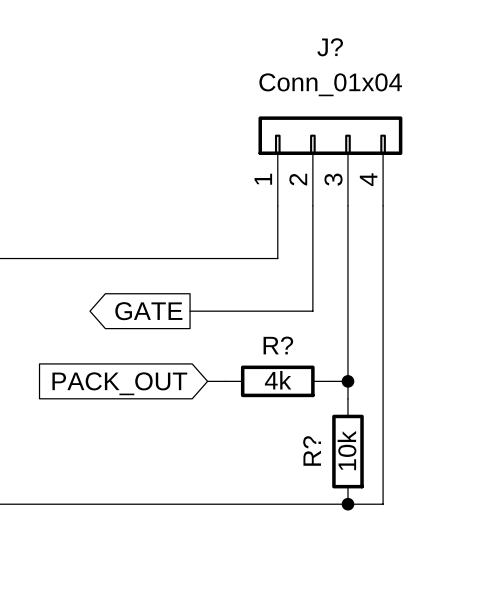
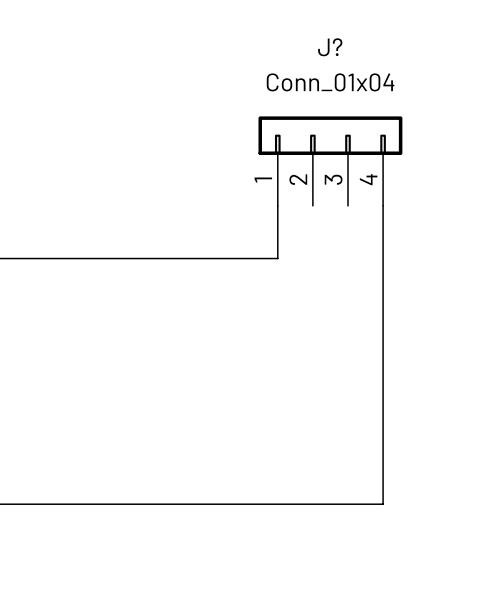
wire: (312, 205) (312, 311) (190, 311) -> none
wire: (347, 205) (347, 398) -> none
global label: GATE (148, 311) -> none
wire: (207, 381) (225, 381) -> none
R?: 4k (277, 381) -> none
wire: (330, 381) (347, 381) -> none
junction: (347, 381) -> none
global label: PACK_OUT (119, 383) -> none
R?: 10k (347, 451) -> none
junction: (347, 504) -> none

